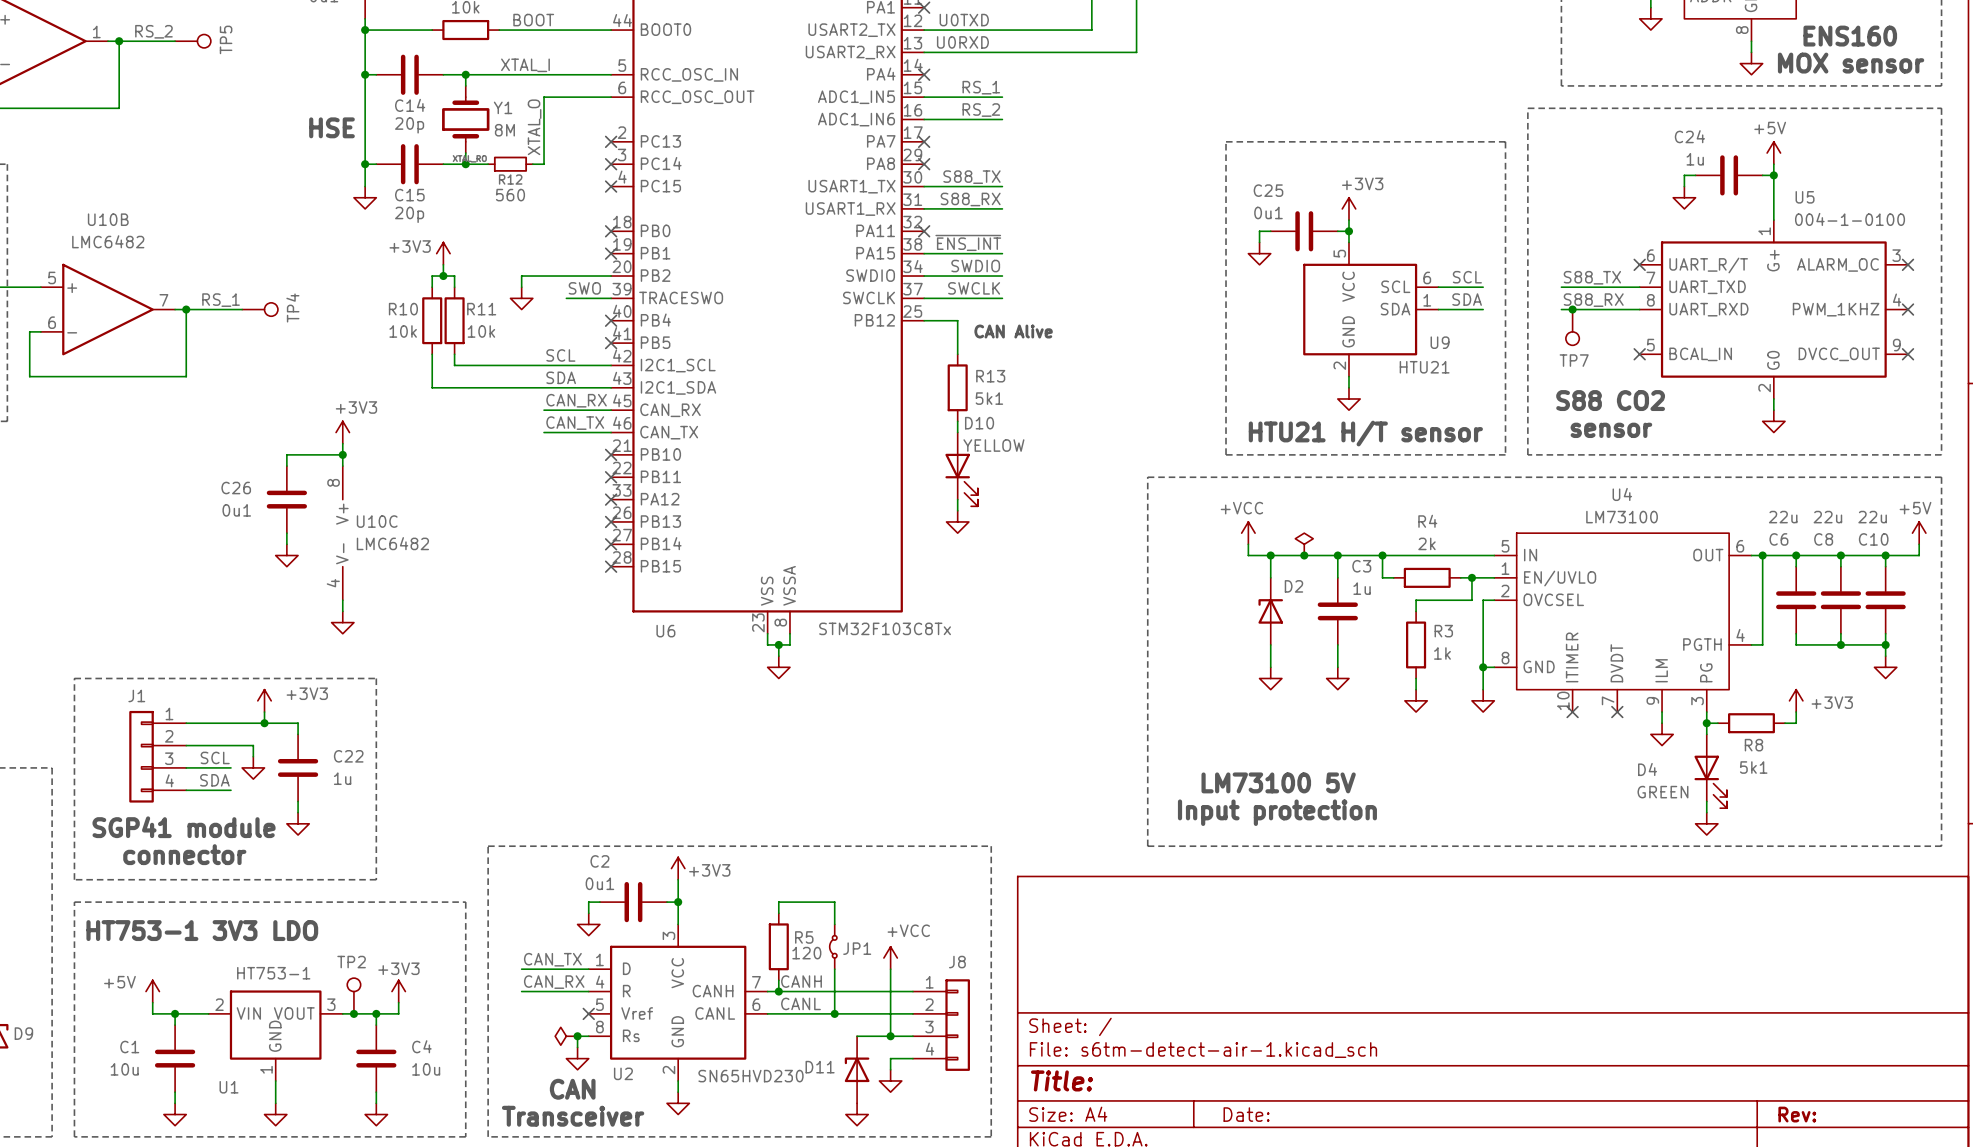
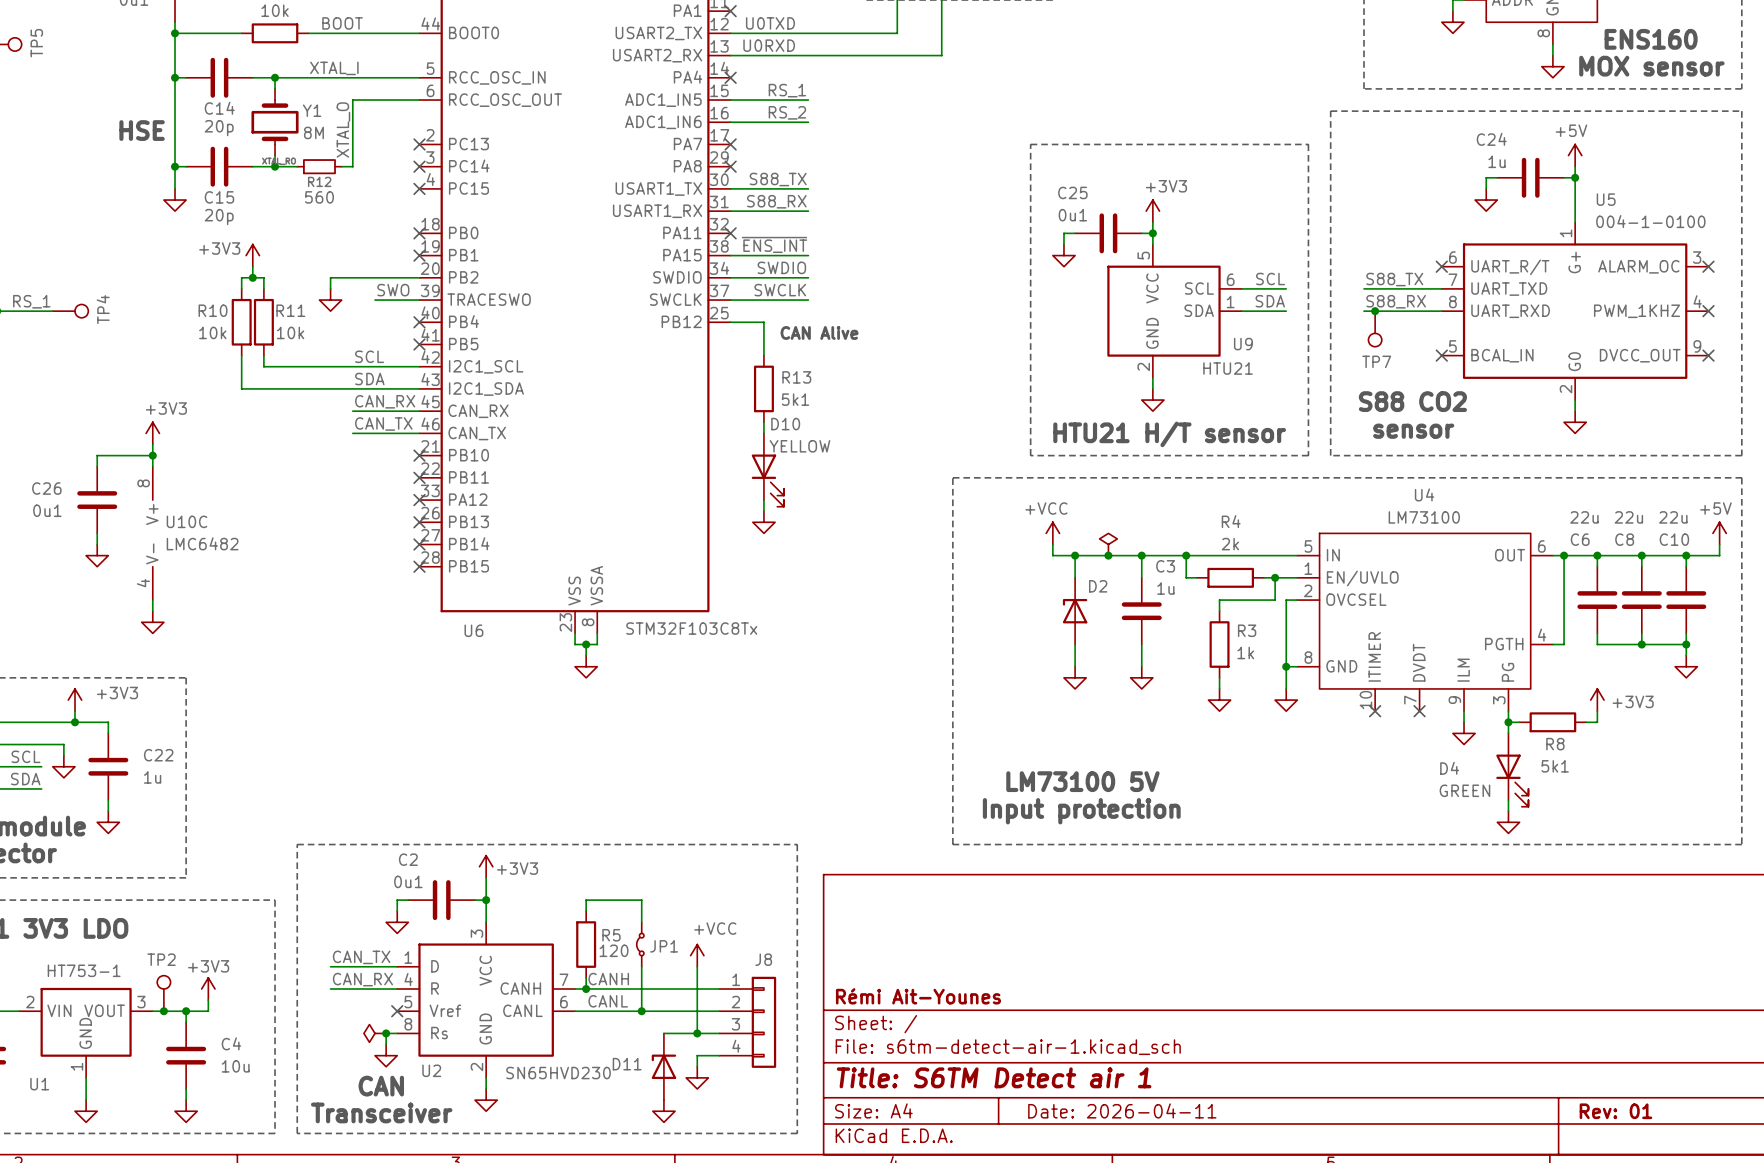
title block: none -> Rémi Ait-Younes (918, 996)
title block: Title: (1062, 1080) -> Title: S6TM Detect air 1 (994, 1077)
title block: Date: (1246, 1114) -> Date: 2026-04-11 (1122, 1110)
title block: Rev: (1797, 1114) -> Rev: 01 (1615, 1111)

